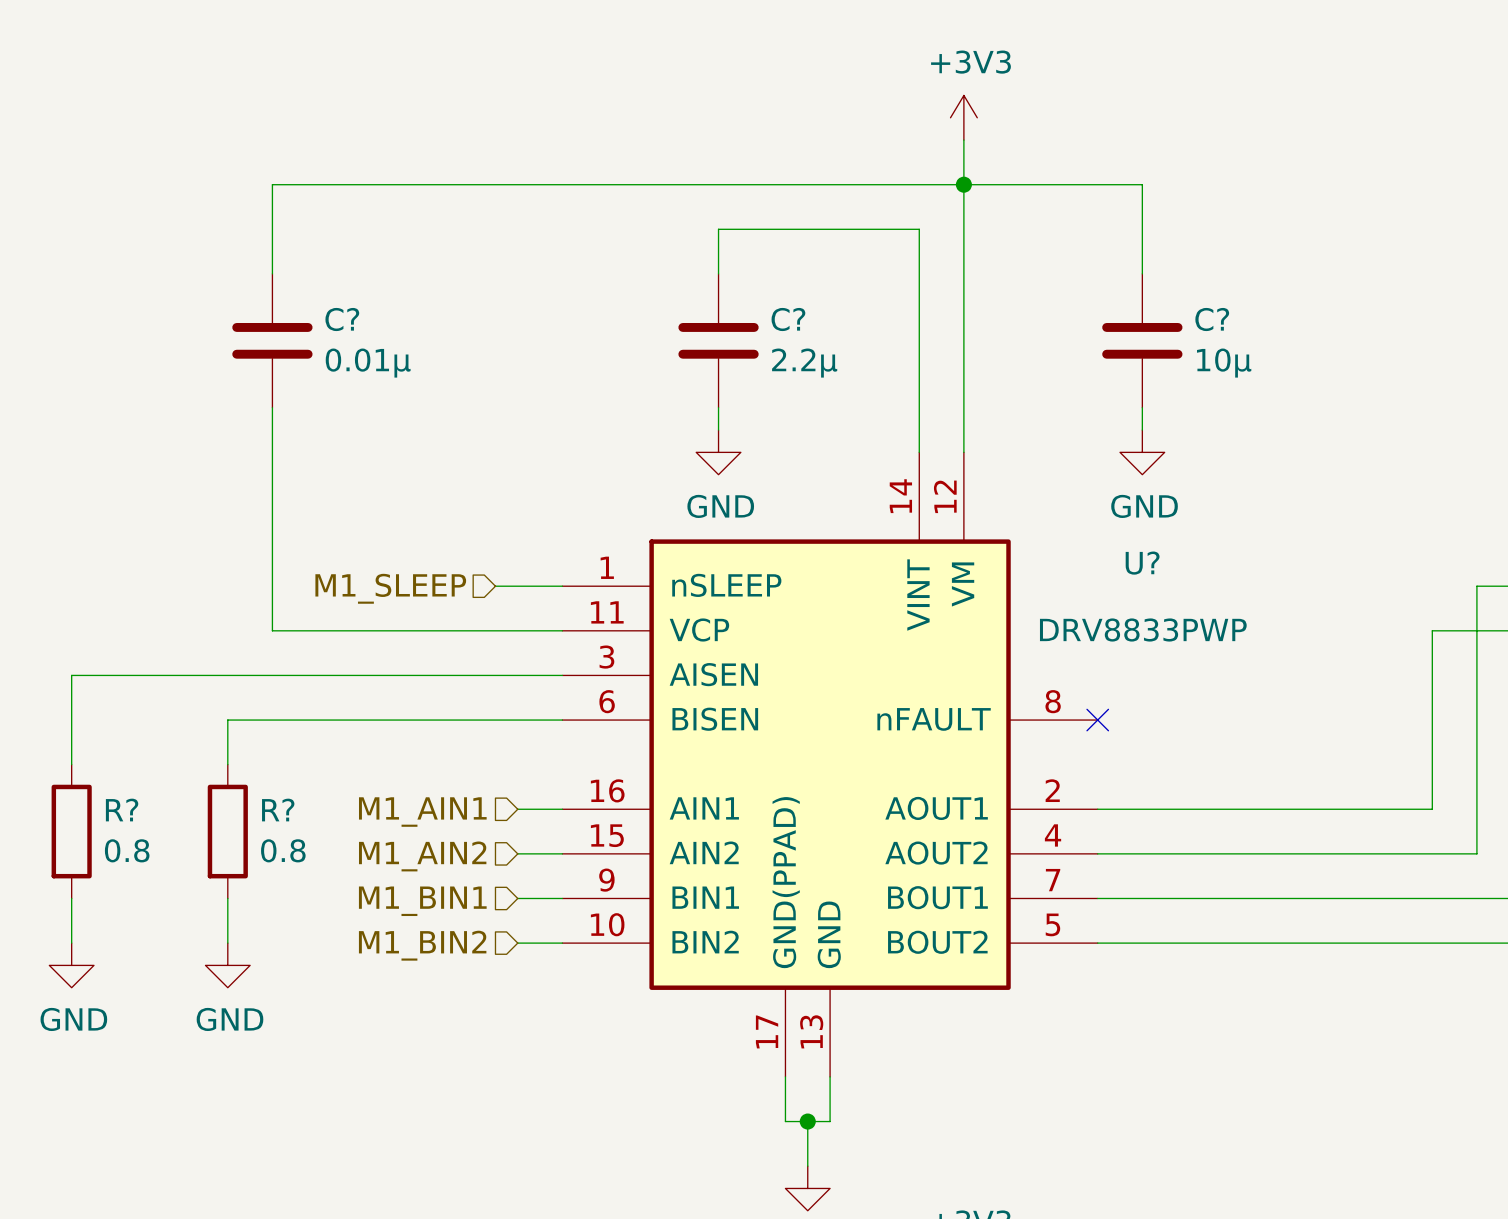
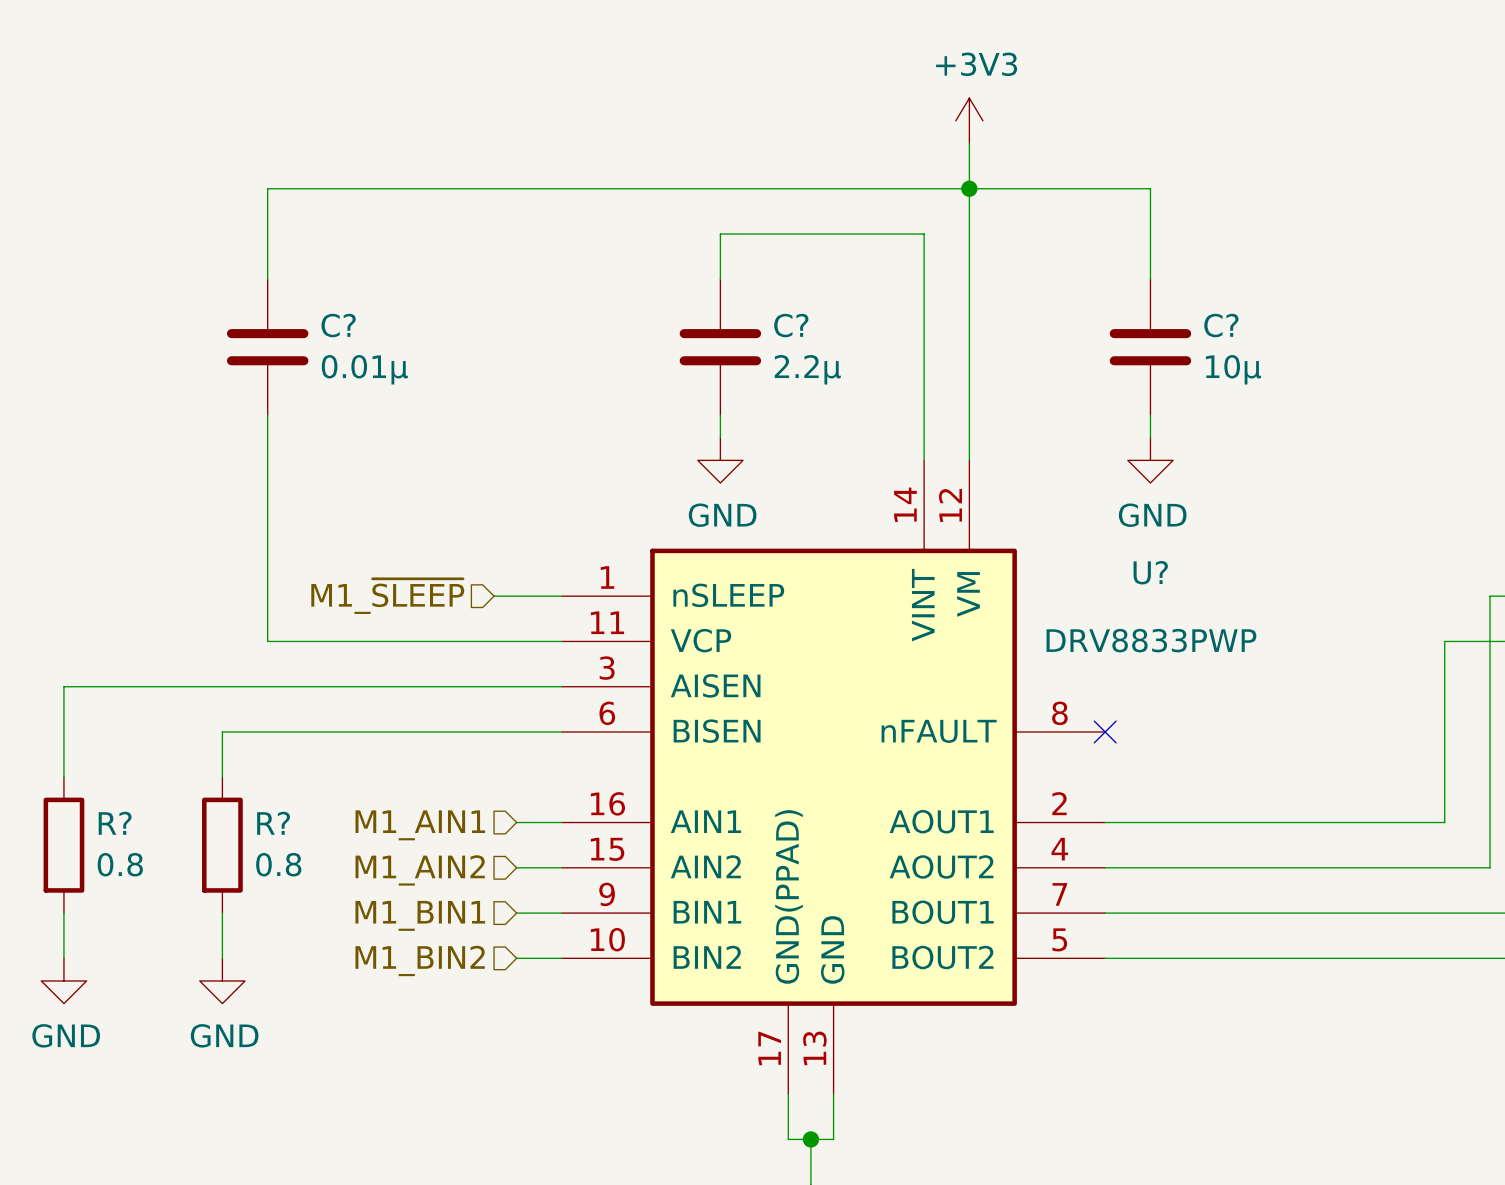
hierarchical label: M1_SLEEP (390, 588) -> M1_~{SLEEP} (387, 596)

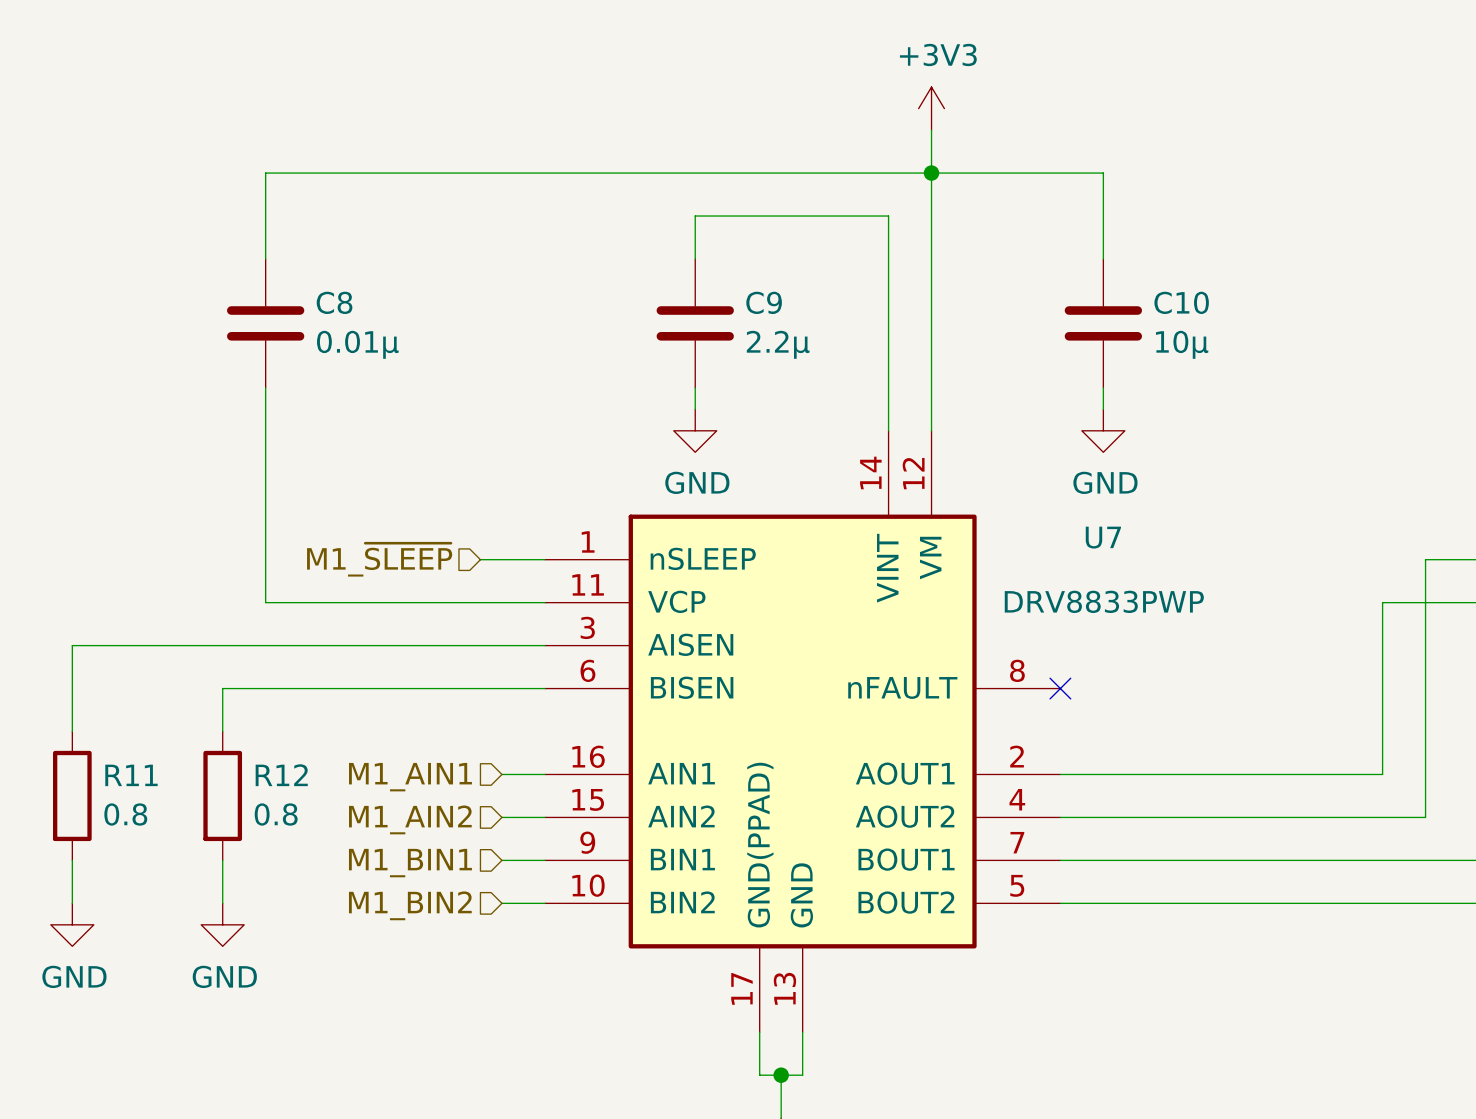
C? name: C? (338, 325) -> C8 (334, 302)
C? name: C? (791, 325) -> C9 (764, 302)
C? name: C? (1221, 325) -> C10 (1181, 302)
U? name: U? (1150, 572) -> U7 (1103, 537)
R? name: R? (115, 823) -> R11 (131, 775)
R? name: R? (273, 823) -> R12 (281, 775)

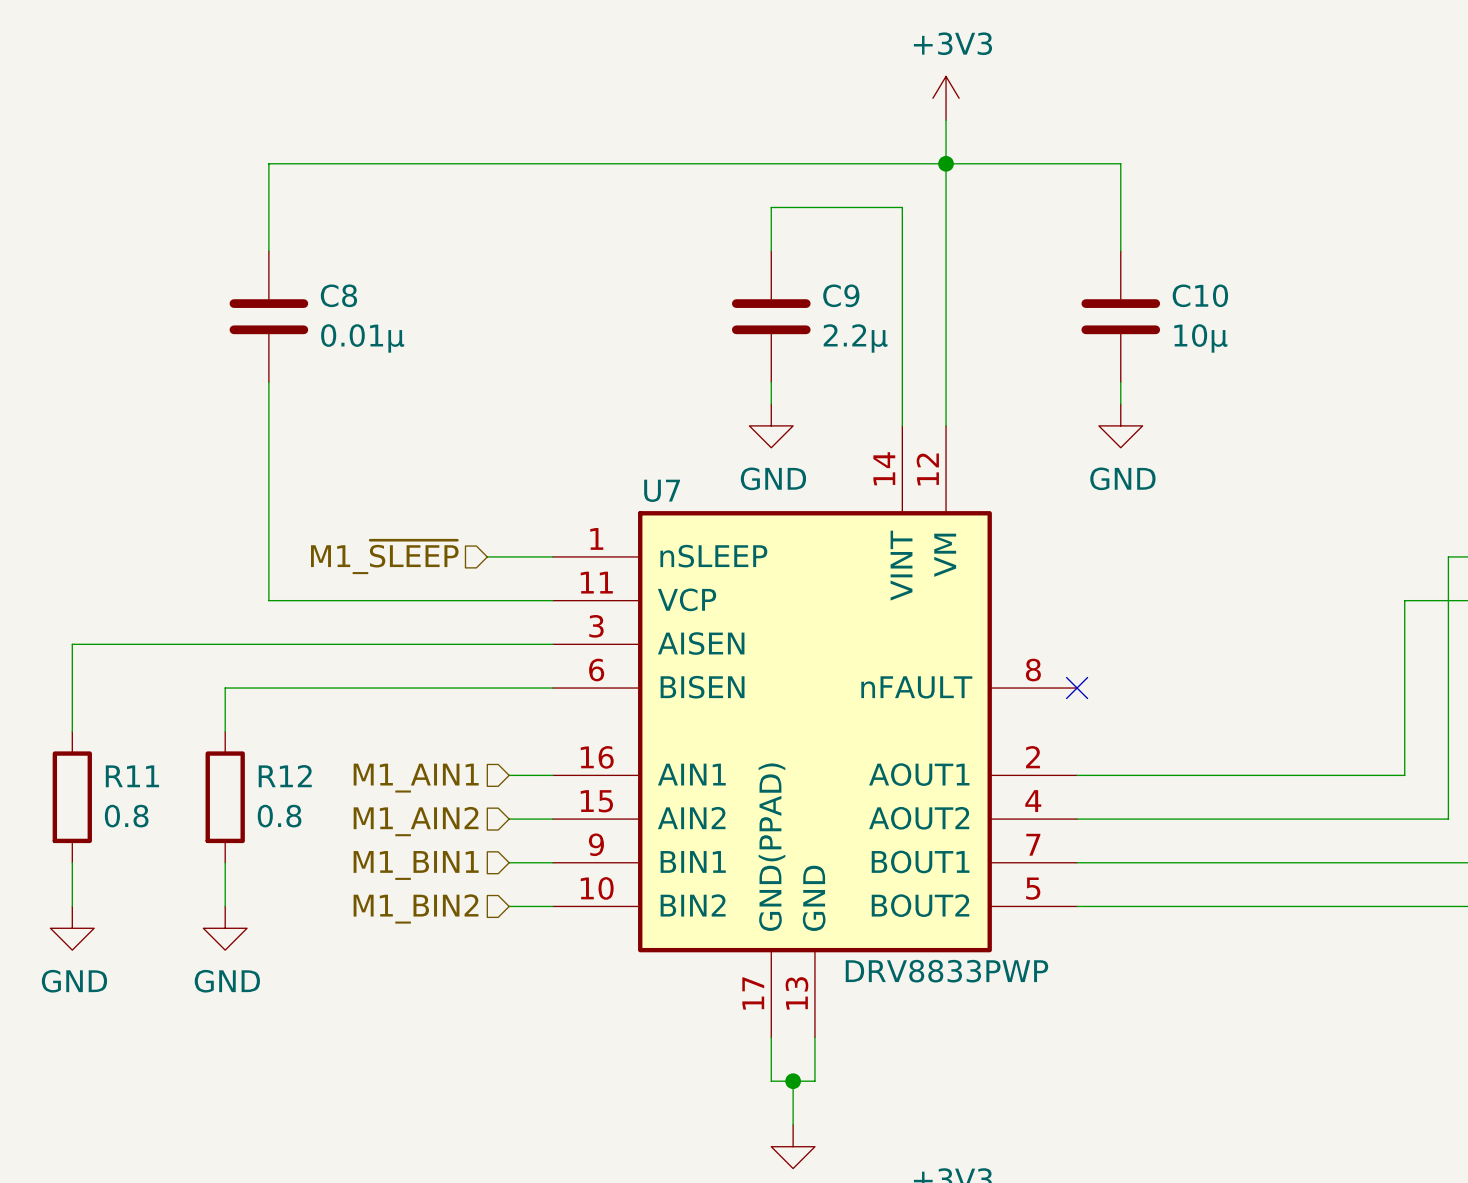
wire: (759, 216) (695, 216) (695, 258) -> (771, 207) (771, 251)
C9 position: (695, 323) -> (771, 316)
wire: (695, 387) (695, 409) -> (771, 382) (771, 404)
power symbol position: GND (695, 430) -> GND (771, 425)
U7 name position: U7 (1103, 537) -> U7 (662, 490)
U7 value position: DRV8833PWP (1104, 601) -> DRV8833PWP (946, 971)

